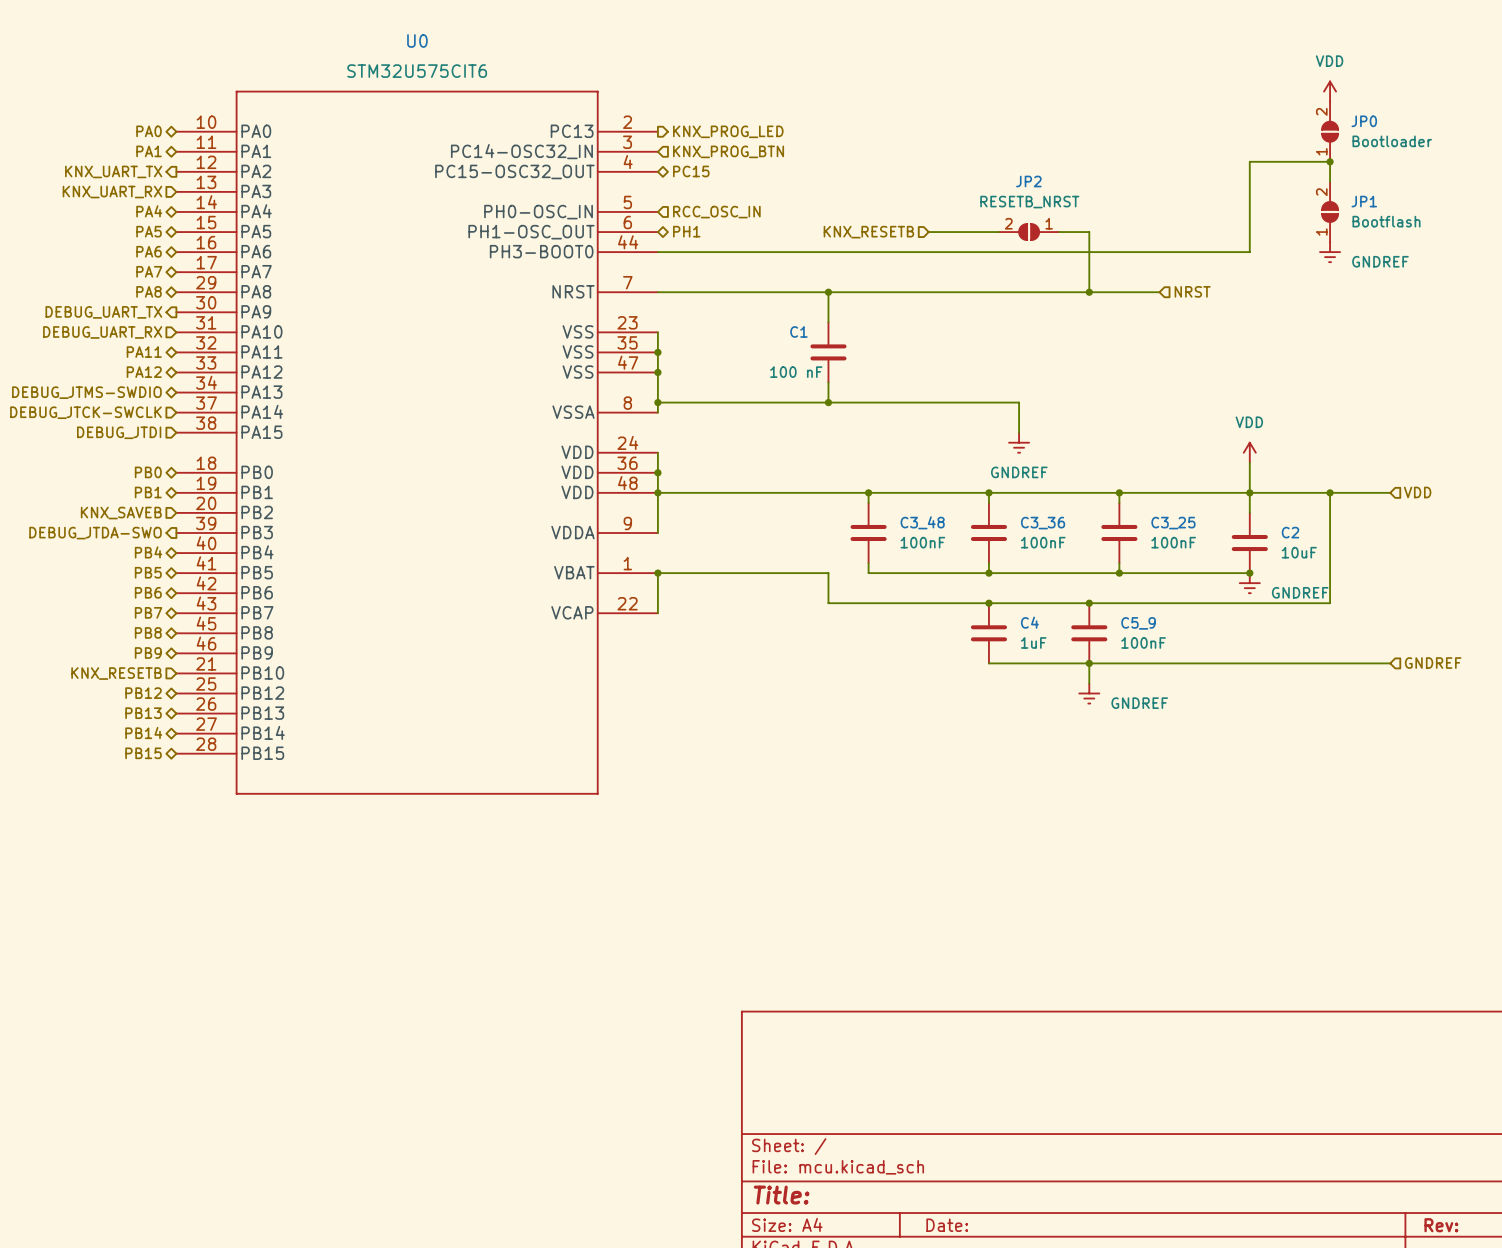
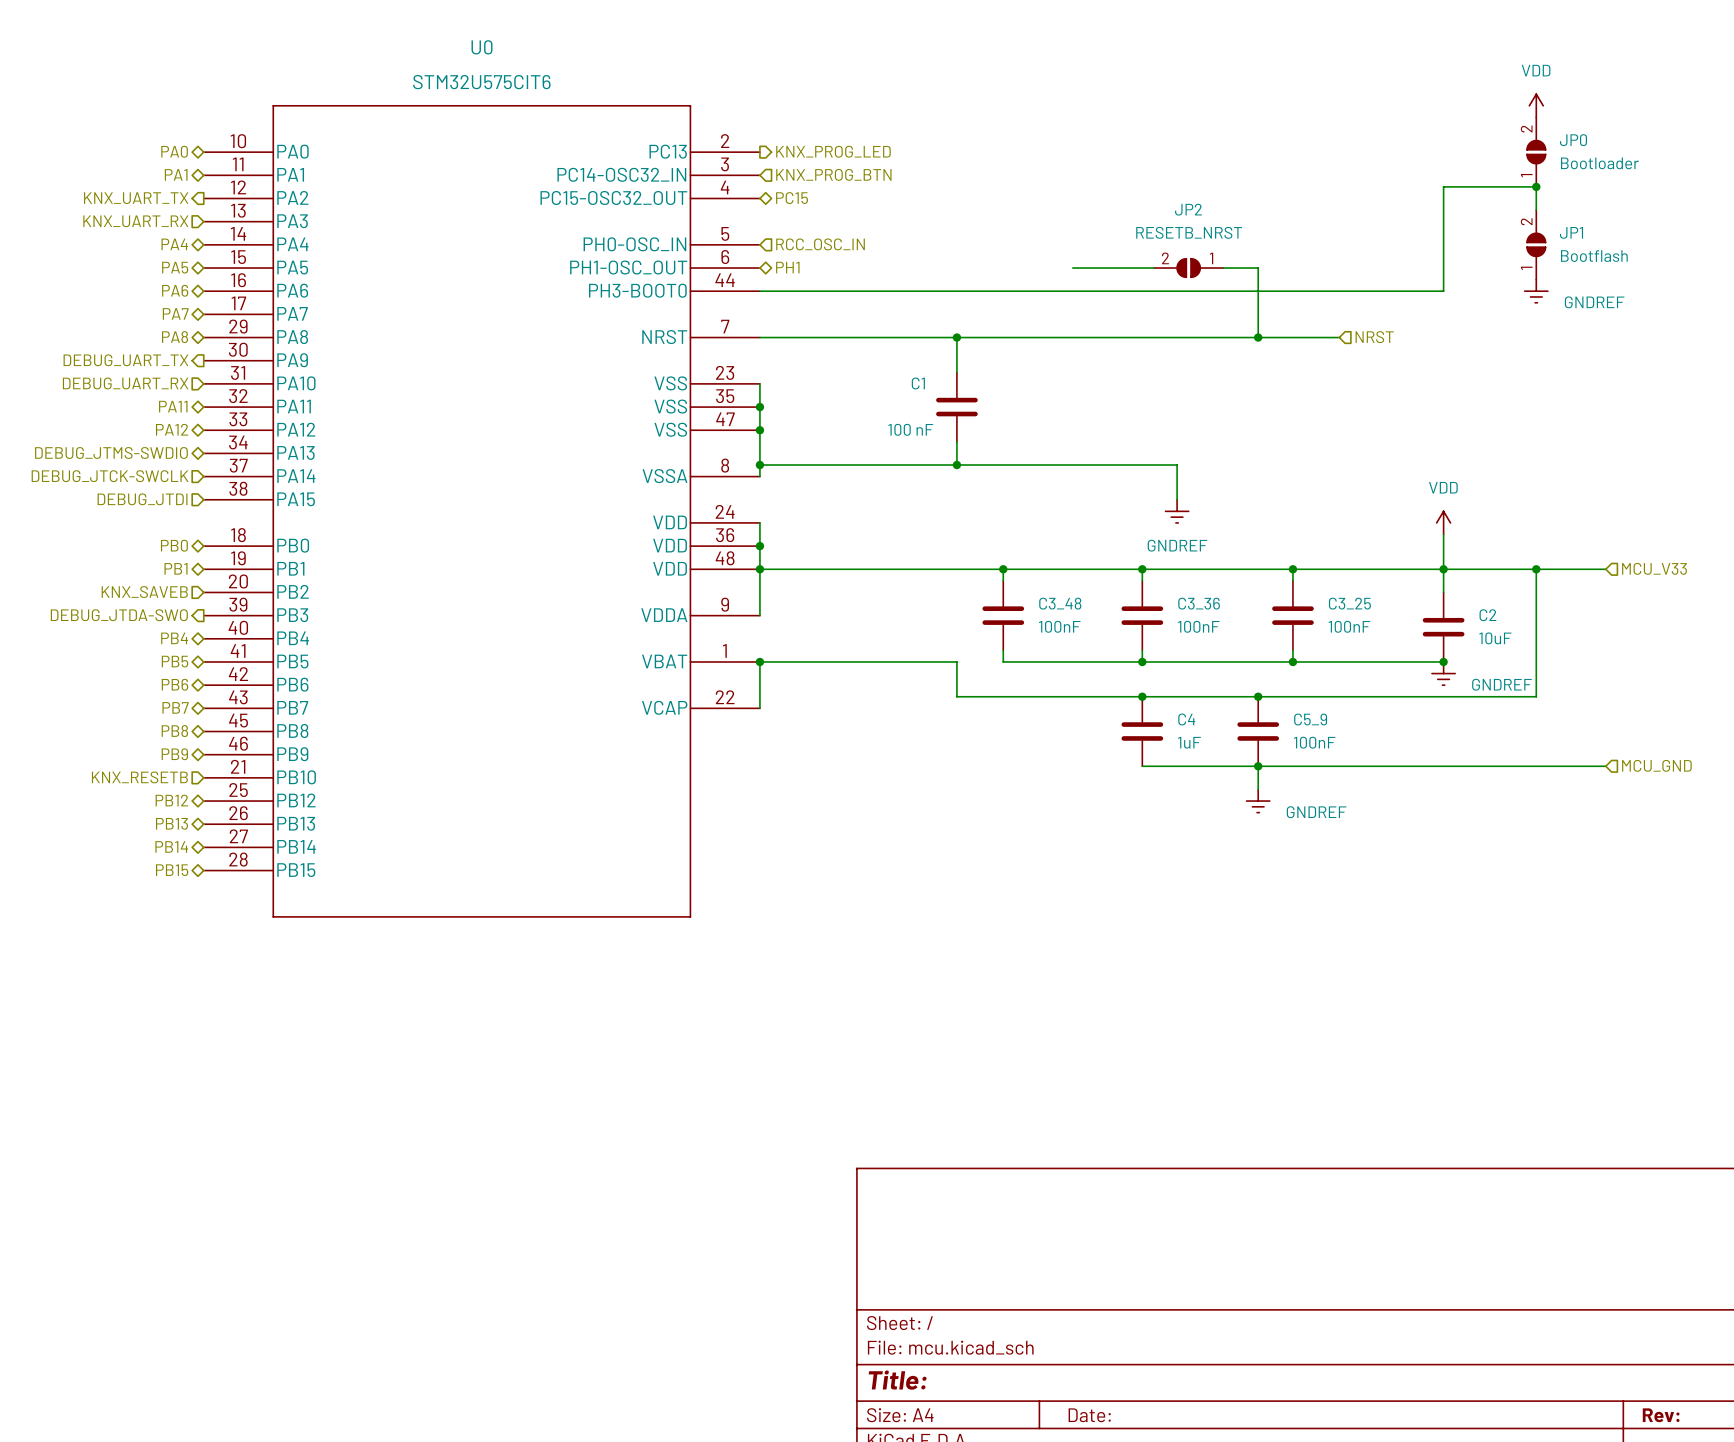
hierarchical label: KNX_RESETB (868, 232) -> none
hierarchical label: VDD (1417, 492) -> MCU_V33 (1654, 568)
hierarchical label: GNDREF (1433, 663) -> MCU_GND (1656, 765)

